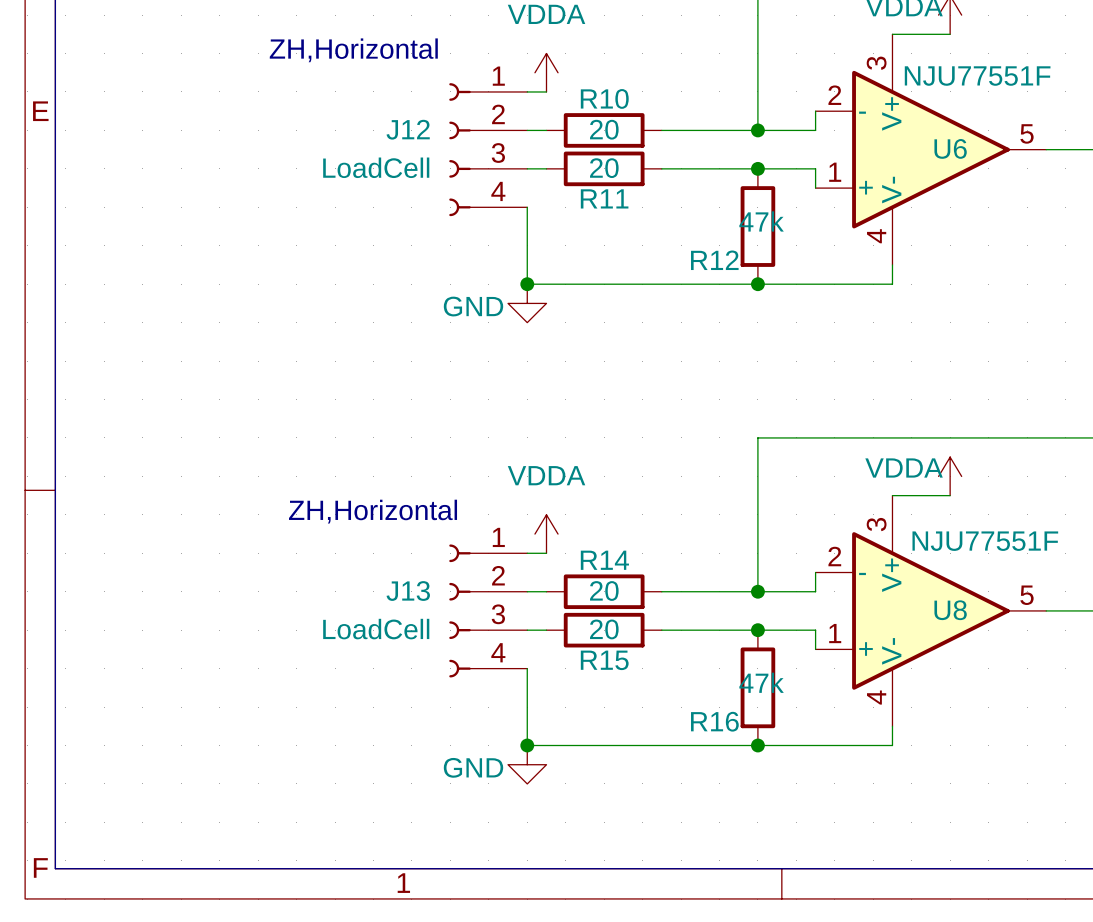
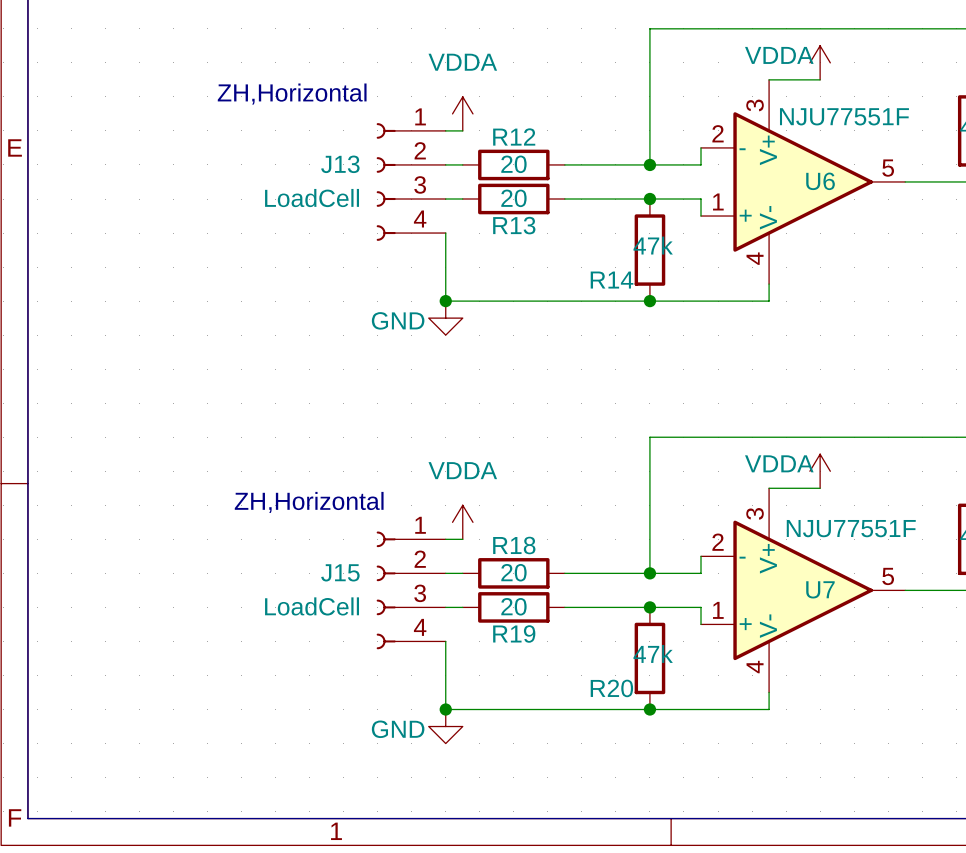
R10 name: R10 (604, 98) -> R12 (514, 136)
J12 name: J12 (408, 129) -> J13 (340, 164)
R11 name: R11 (604, 198) -> R13 (514, 225)
R12 name: R12 (714, 260) -> R14 (612, 280)
R14 name: R14 (604, 560) -> R18 (514, 545)
J13 name: J13 (408, 591) -> J15 (340, 572)
U8 name: U8 (950, 610) -> U7 (820, 589)
R15 name: R15 (604, 660) -> R19 (514, 633)
R16 name: R16 (714, 721) -> R20 (611, 688)

